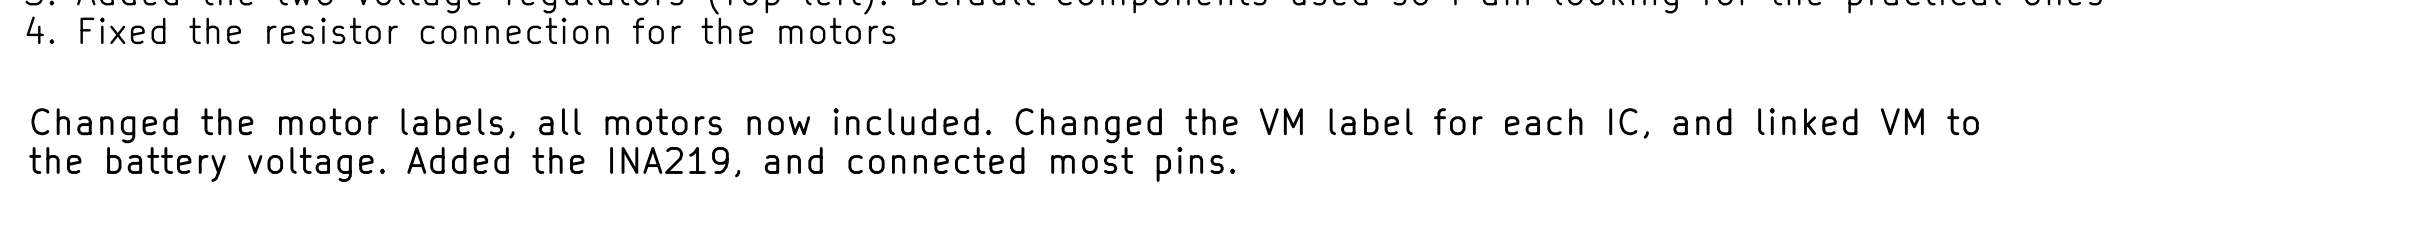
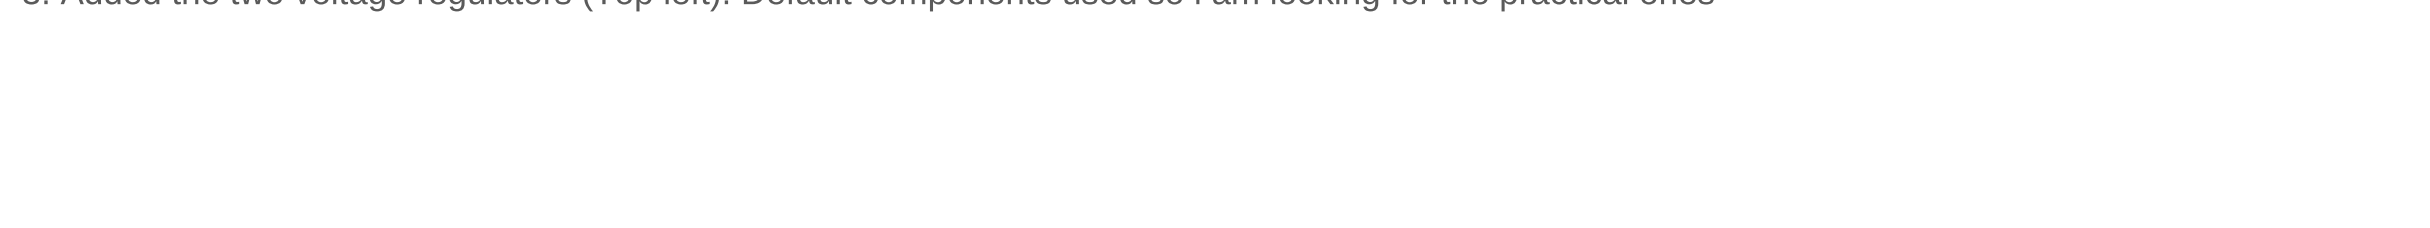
text: 4. Fixed the resistor connection for the motors (460, 30) -> none
text: Changed the motor labels, all motors now included. Changed the VM label for each IC, and linked VM to (1005, 125) -> none
text: the battery voltage. Added the INA219, and connected most pins. (632, 164) -> none

